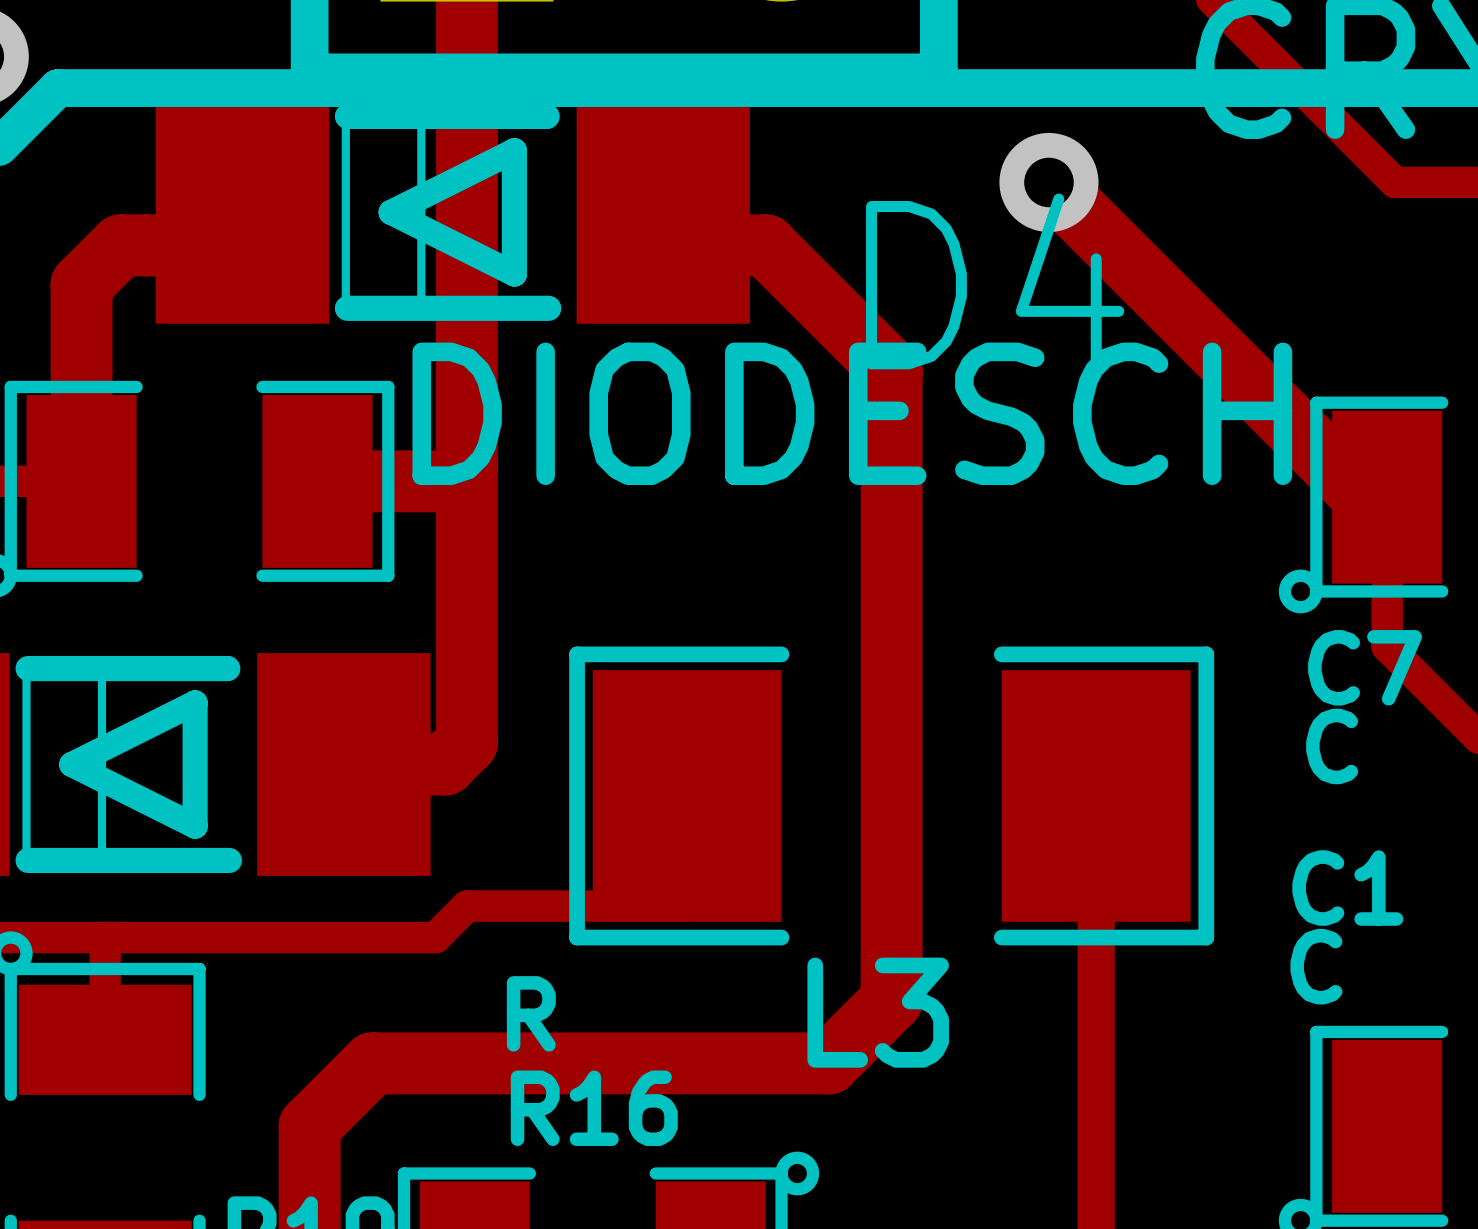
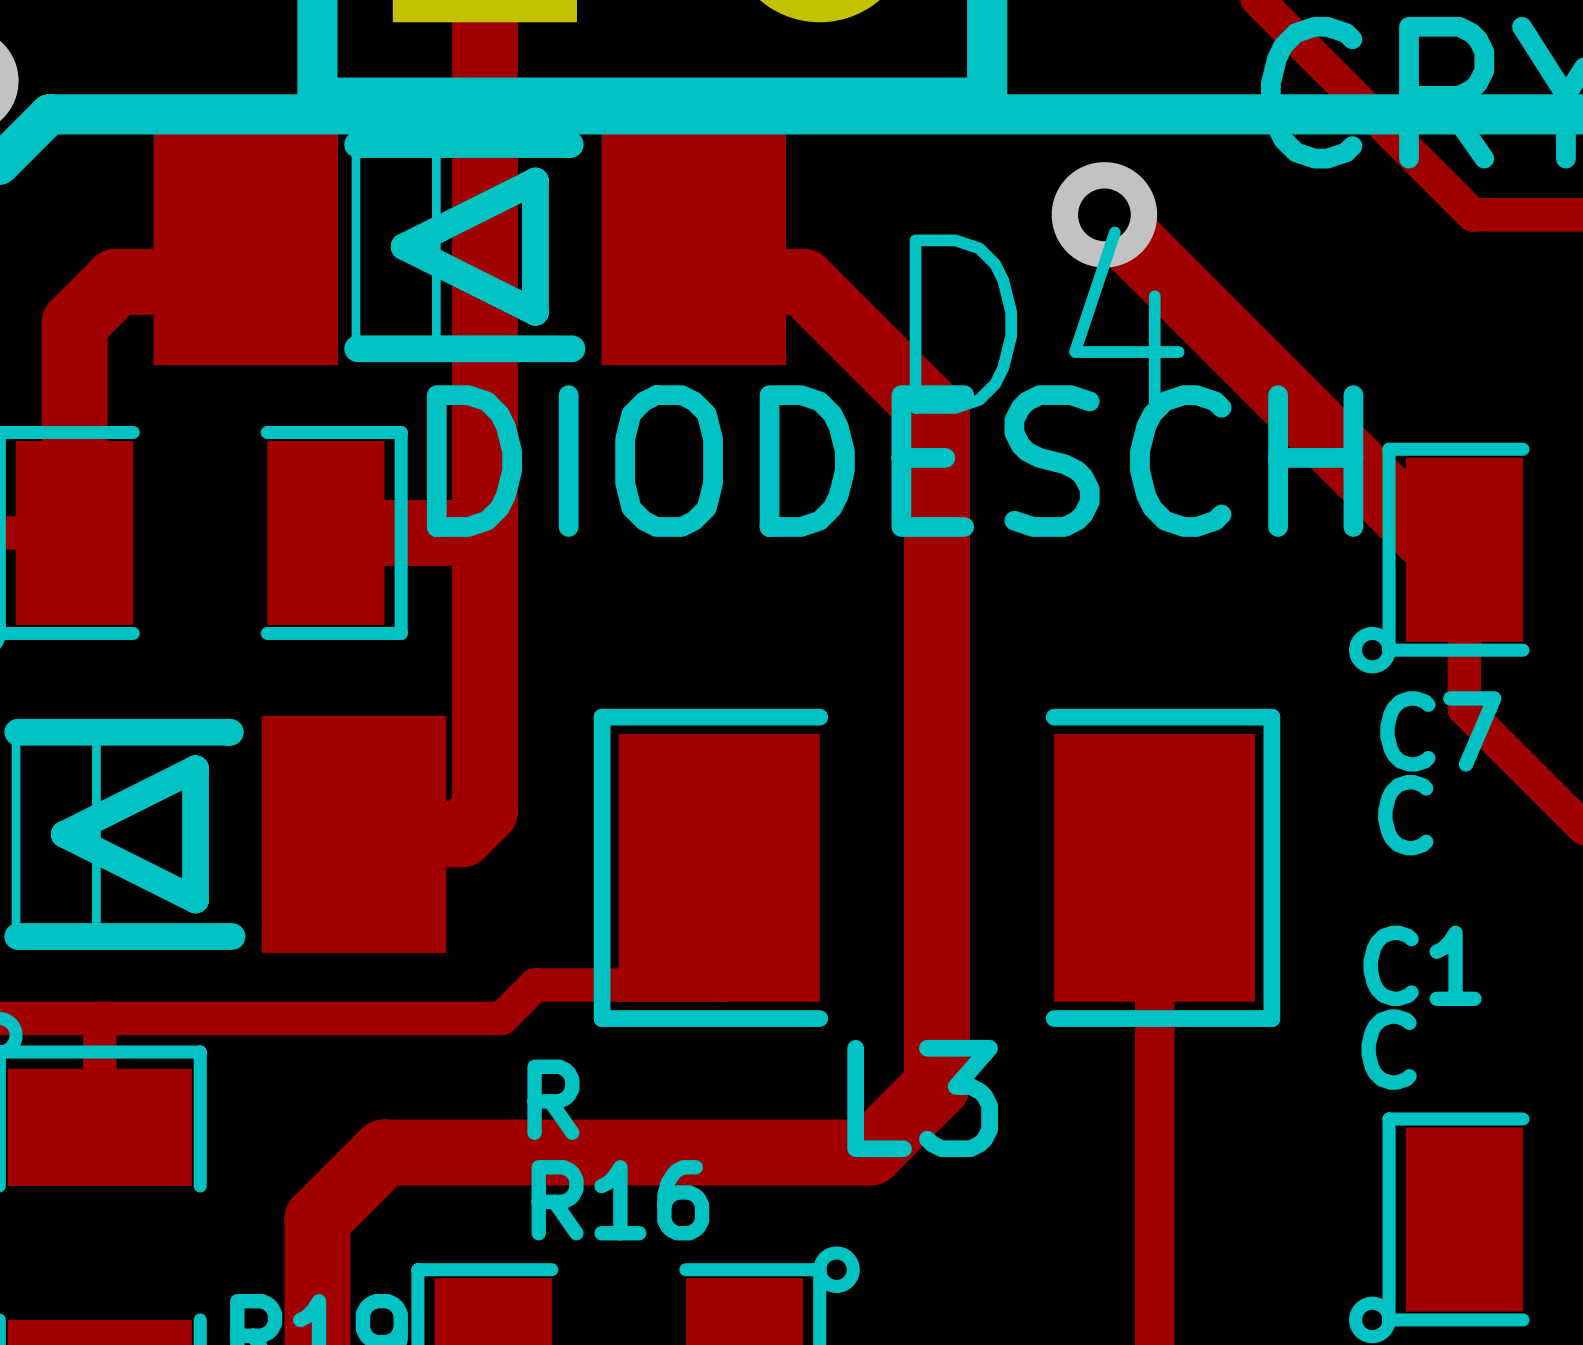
track: (514, 906) (466, 906) (435, 937) -> (535, 985) (501, 1018) (451, 1018)

